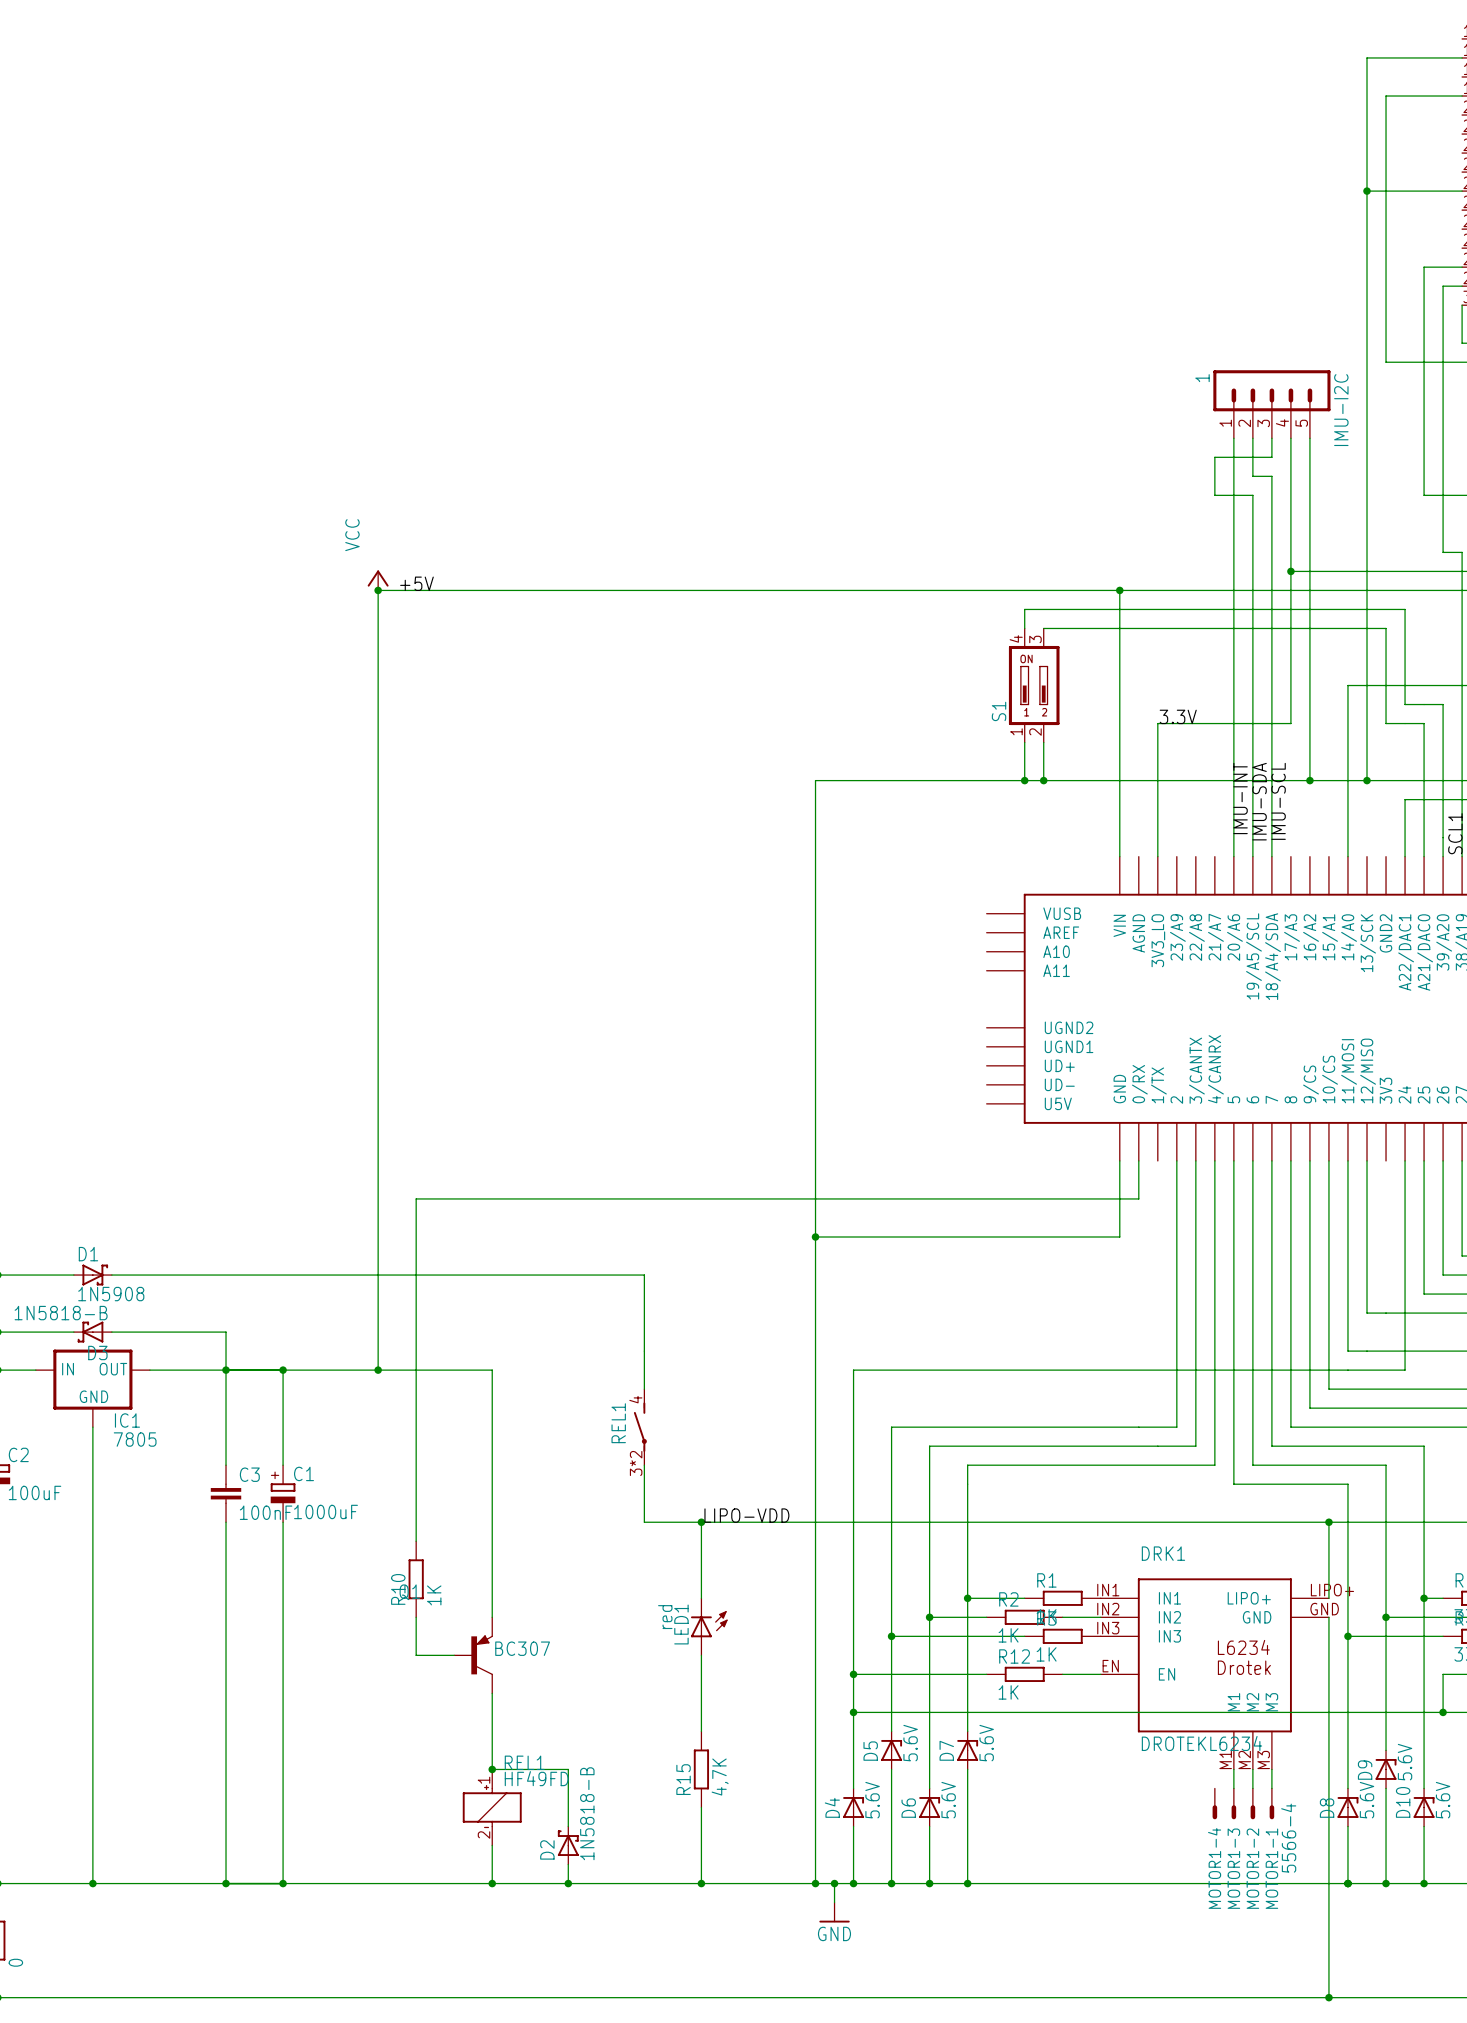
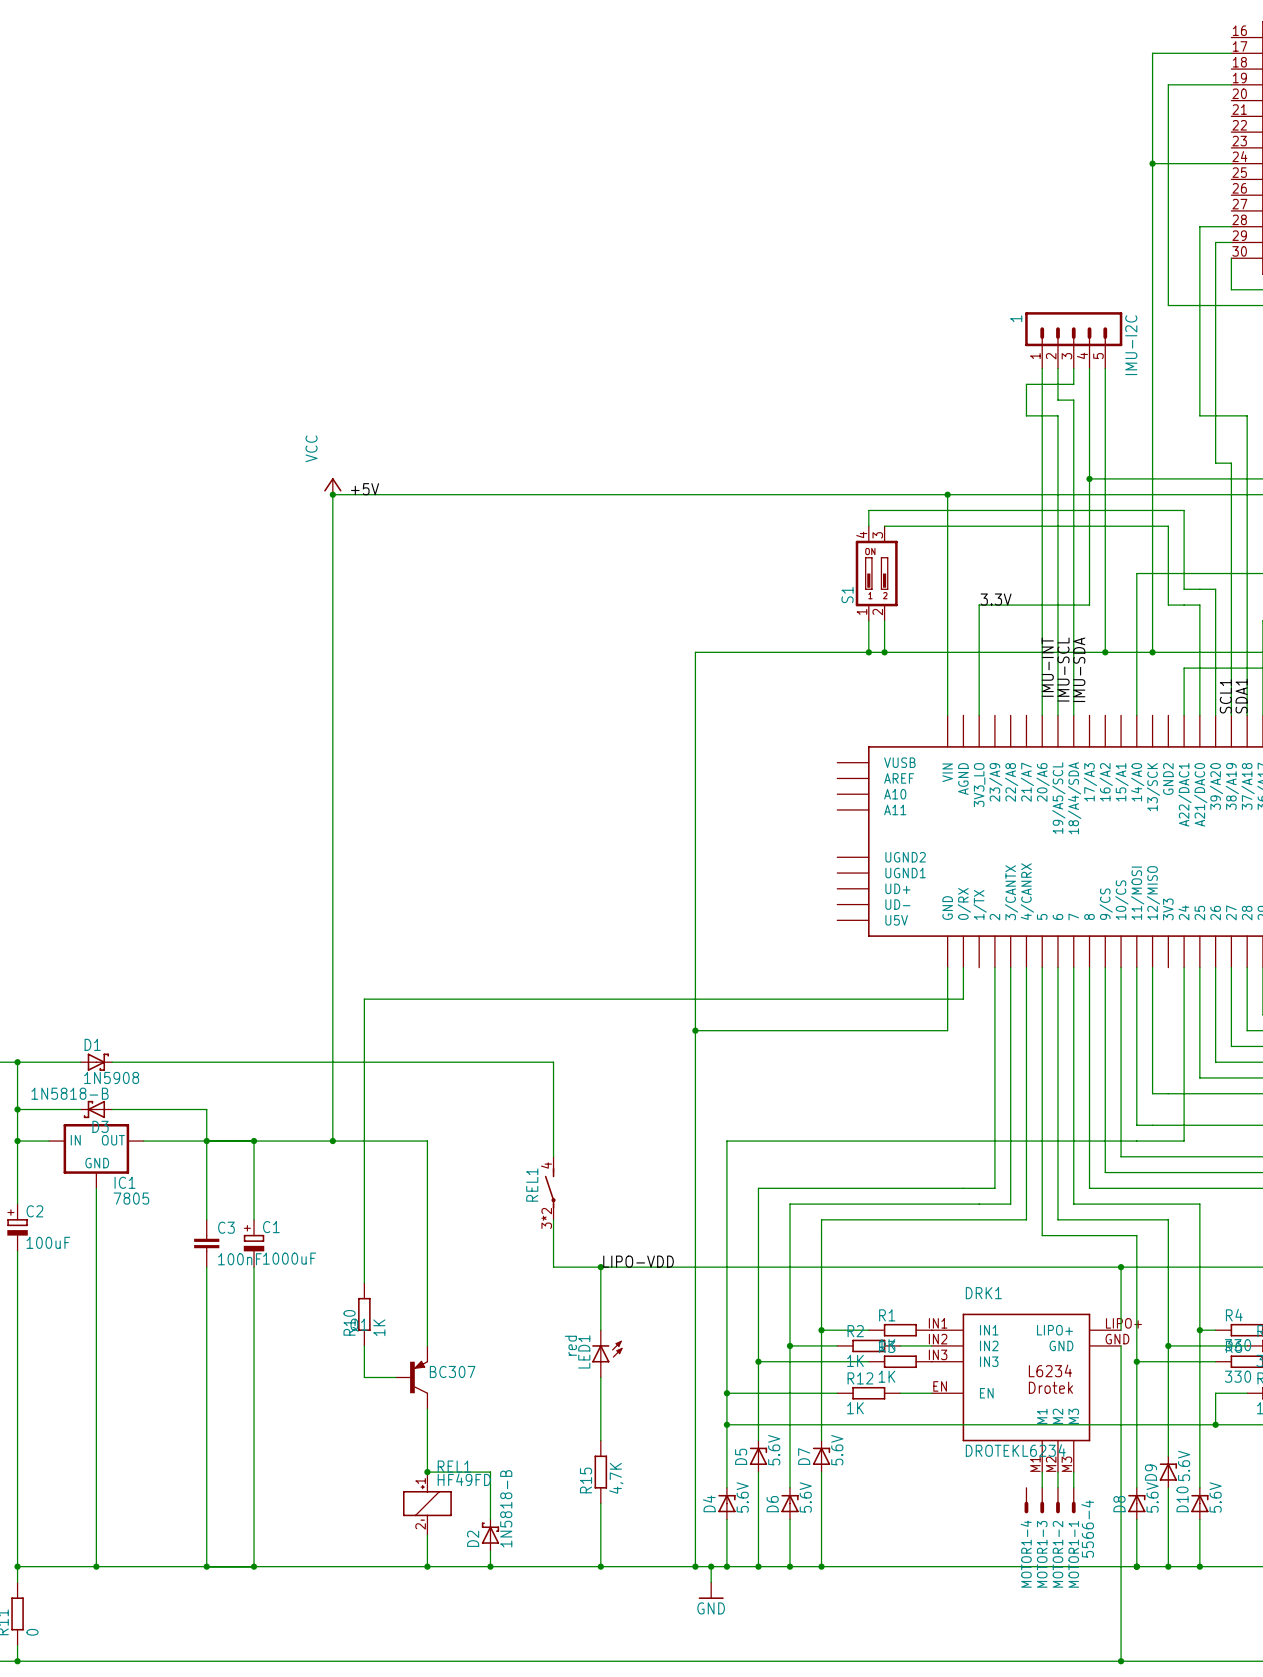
label: IMU-SDA (1259, 801) -> IMU-SCL (1063, 669)
label: IMU-SCL (1278, 801) -> IMU-SDA (1079, 669)

